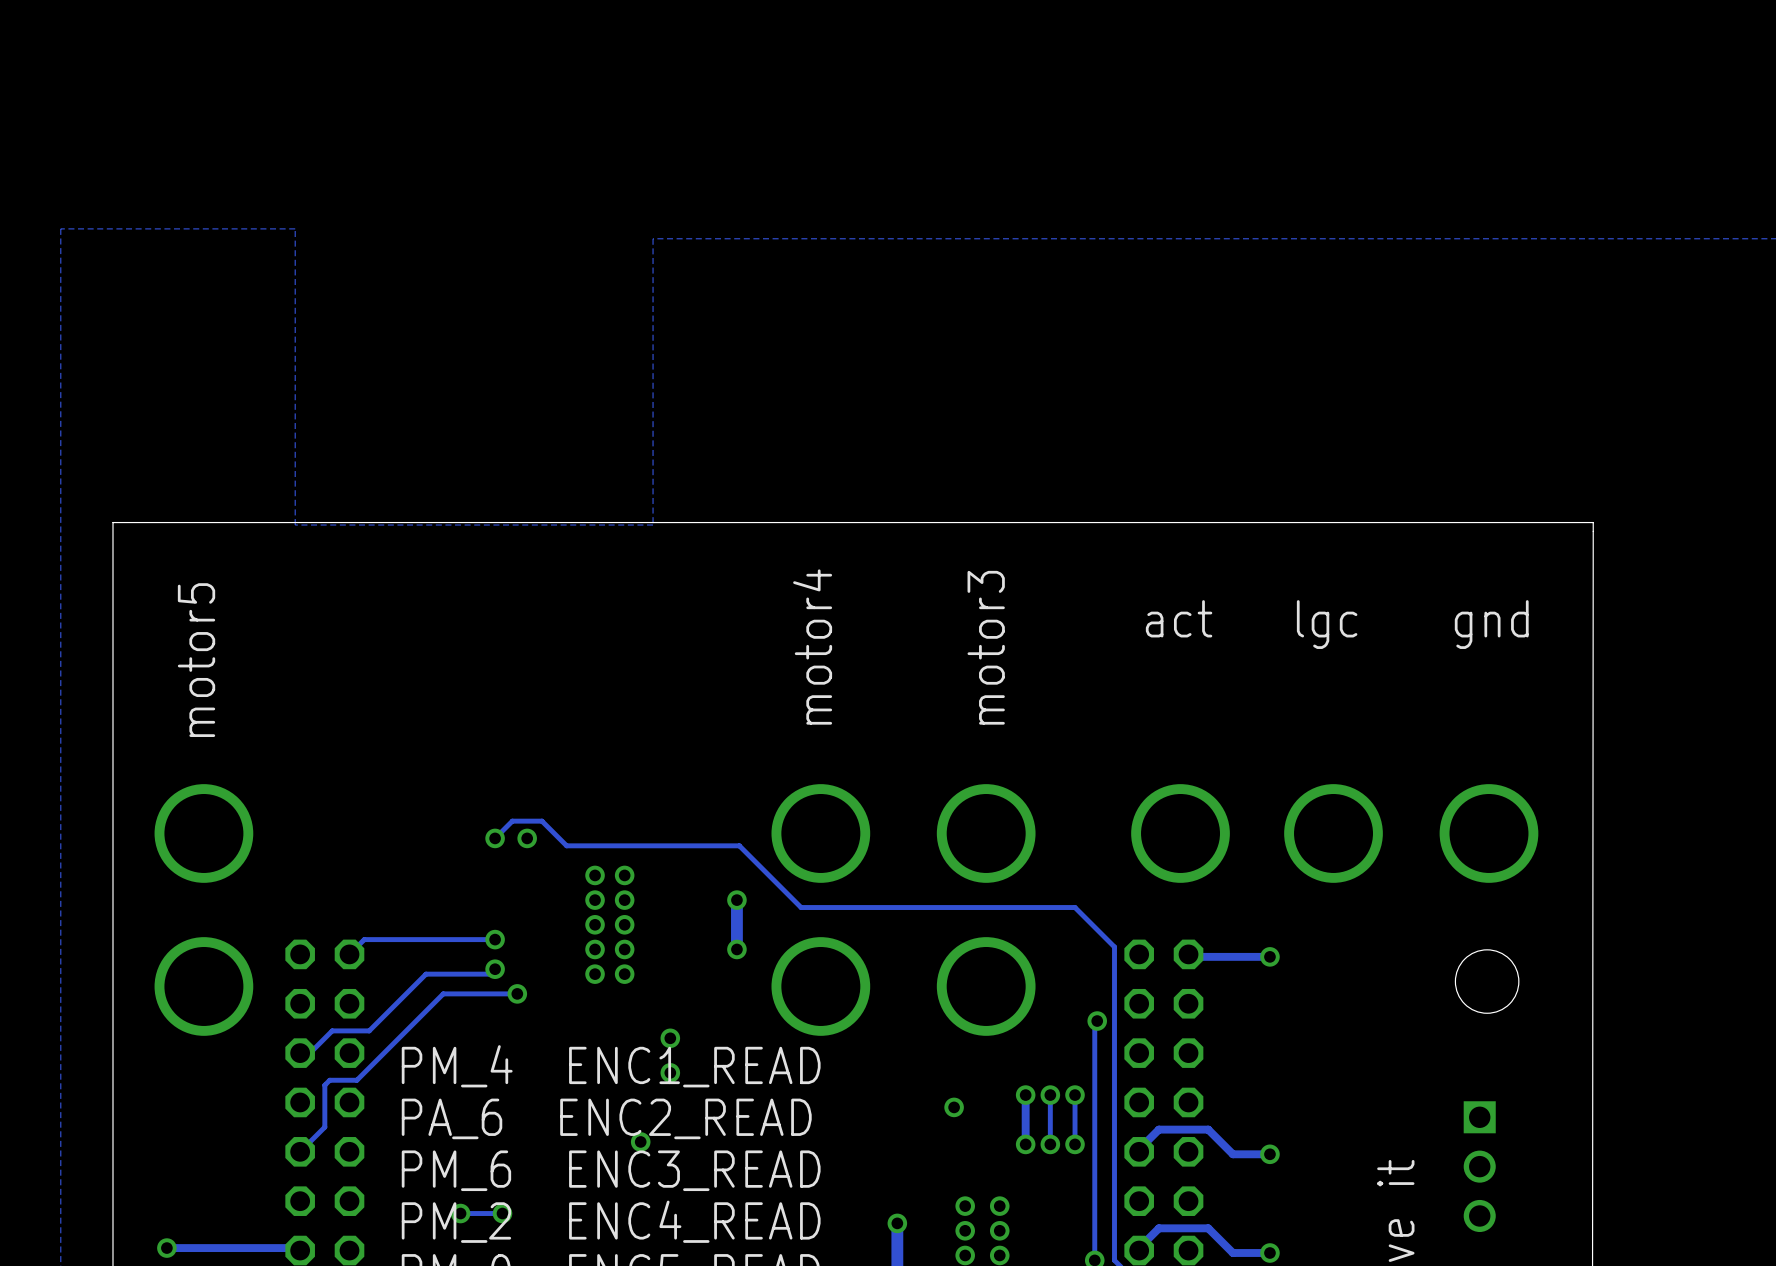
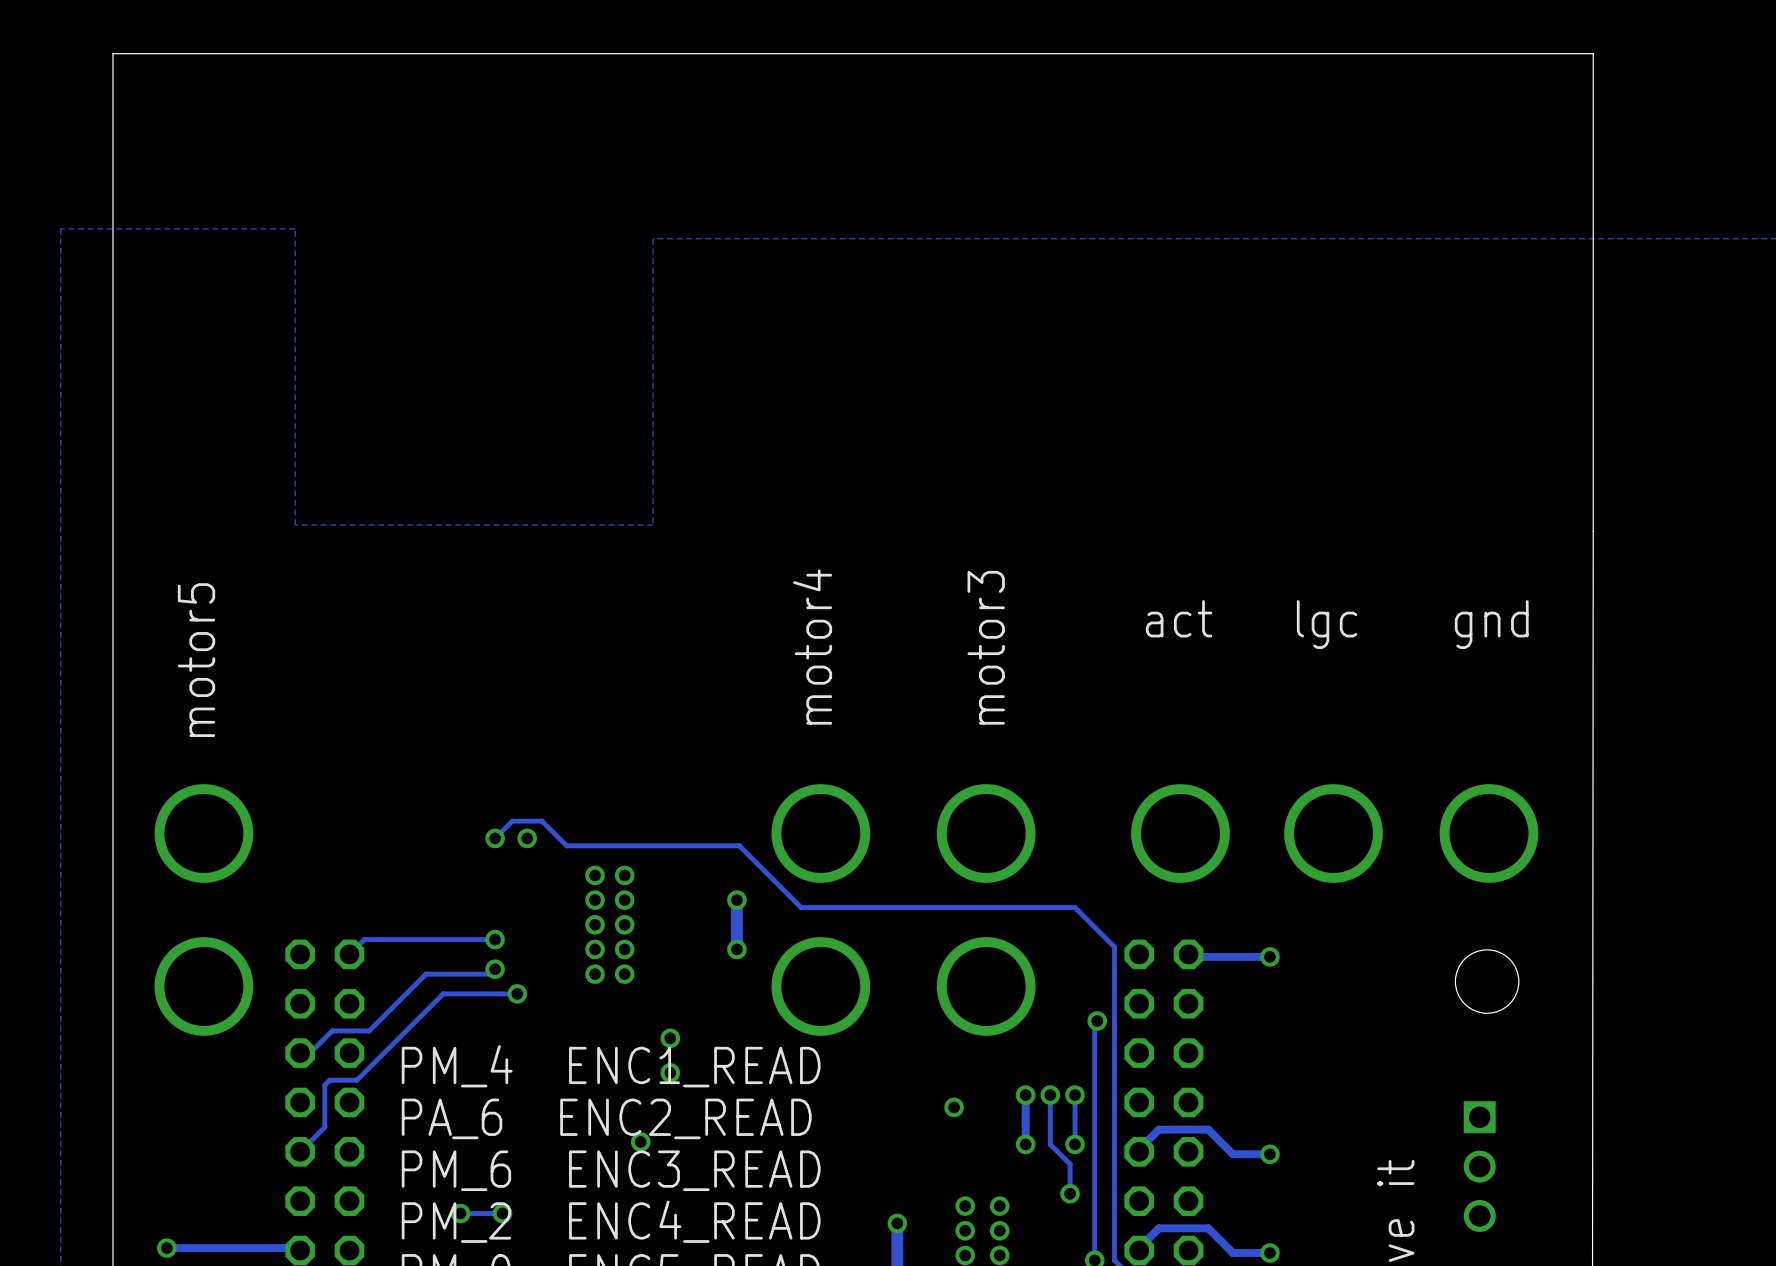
board edge: (1593, 522) (112, 522) -> (1593, 522) (1593, 53) (112, 53) (112, 522)
track: none -> (1050, 1144) (1070, 1164) (1070, 1193)
via position: (1050, 1144) -> (1070, 1193)

